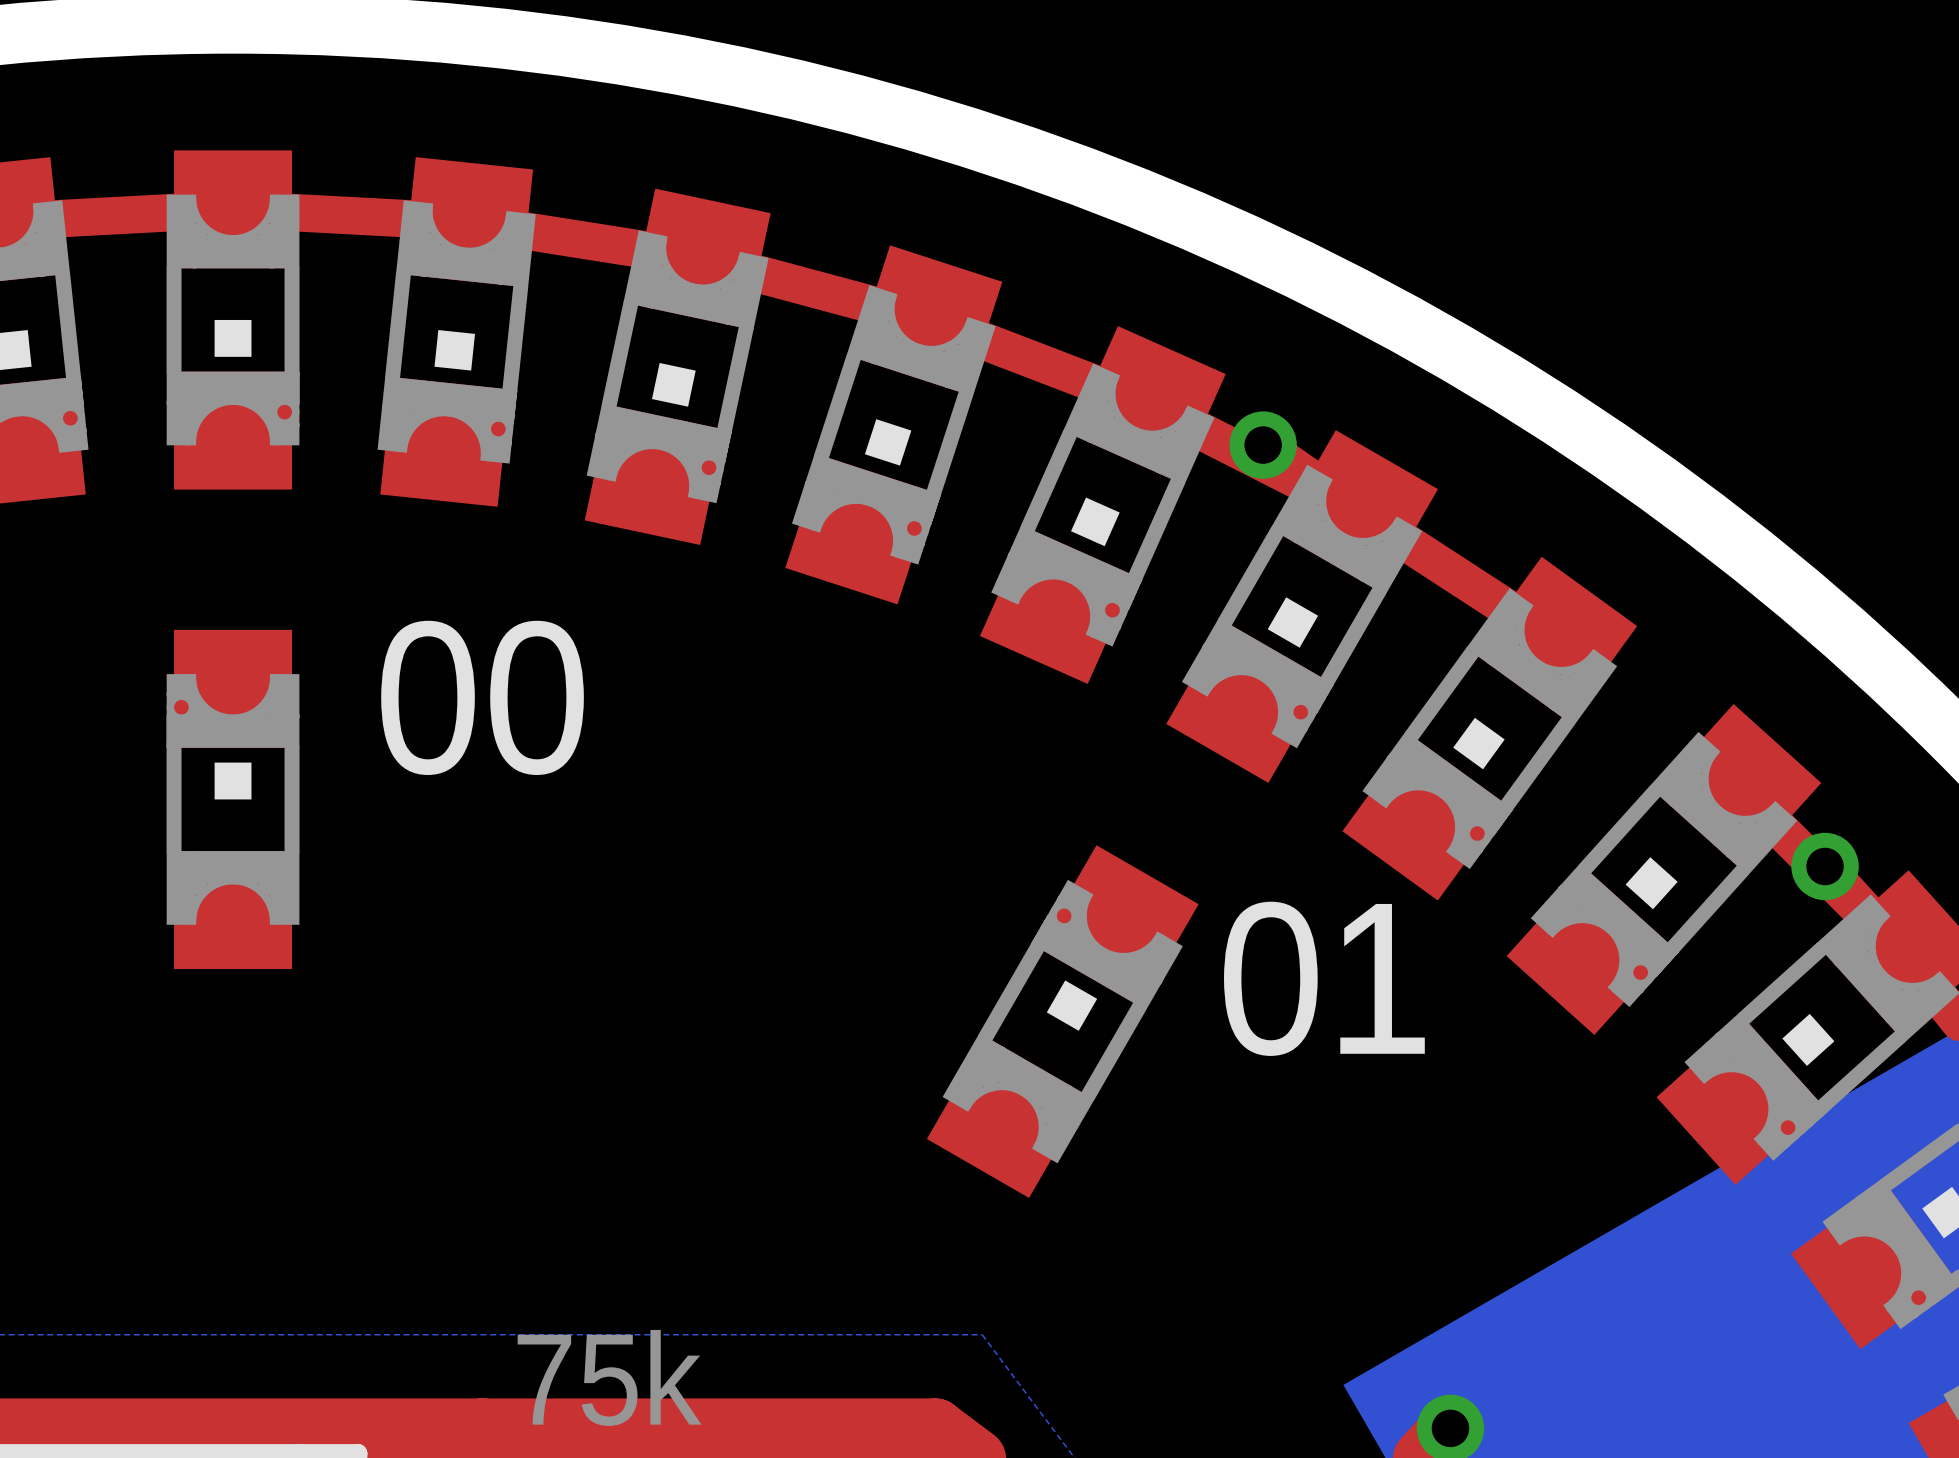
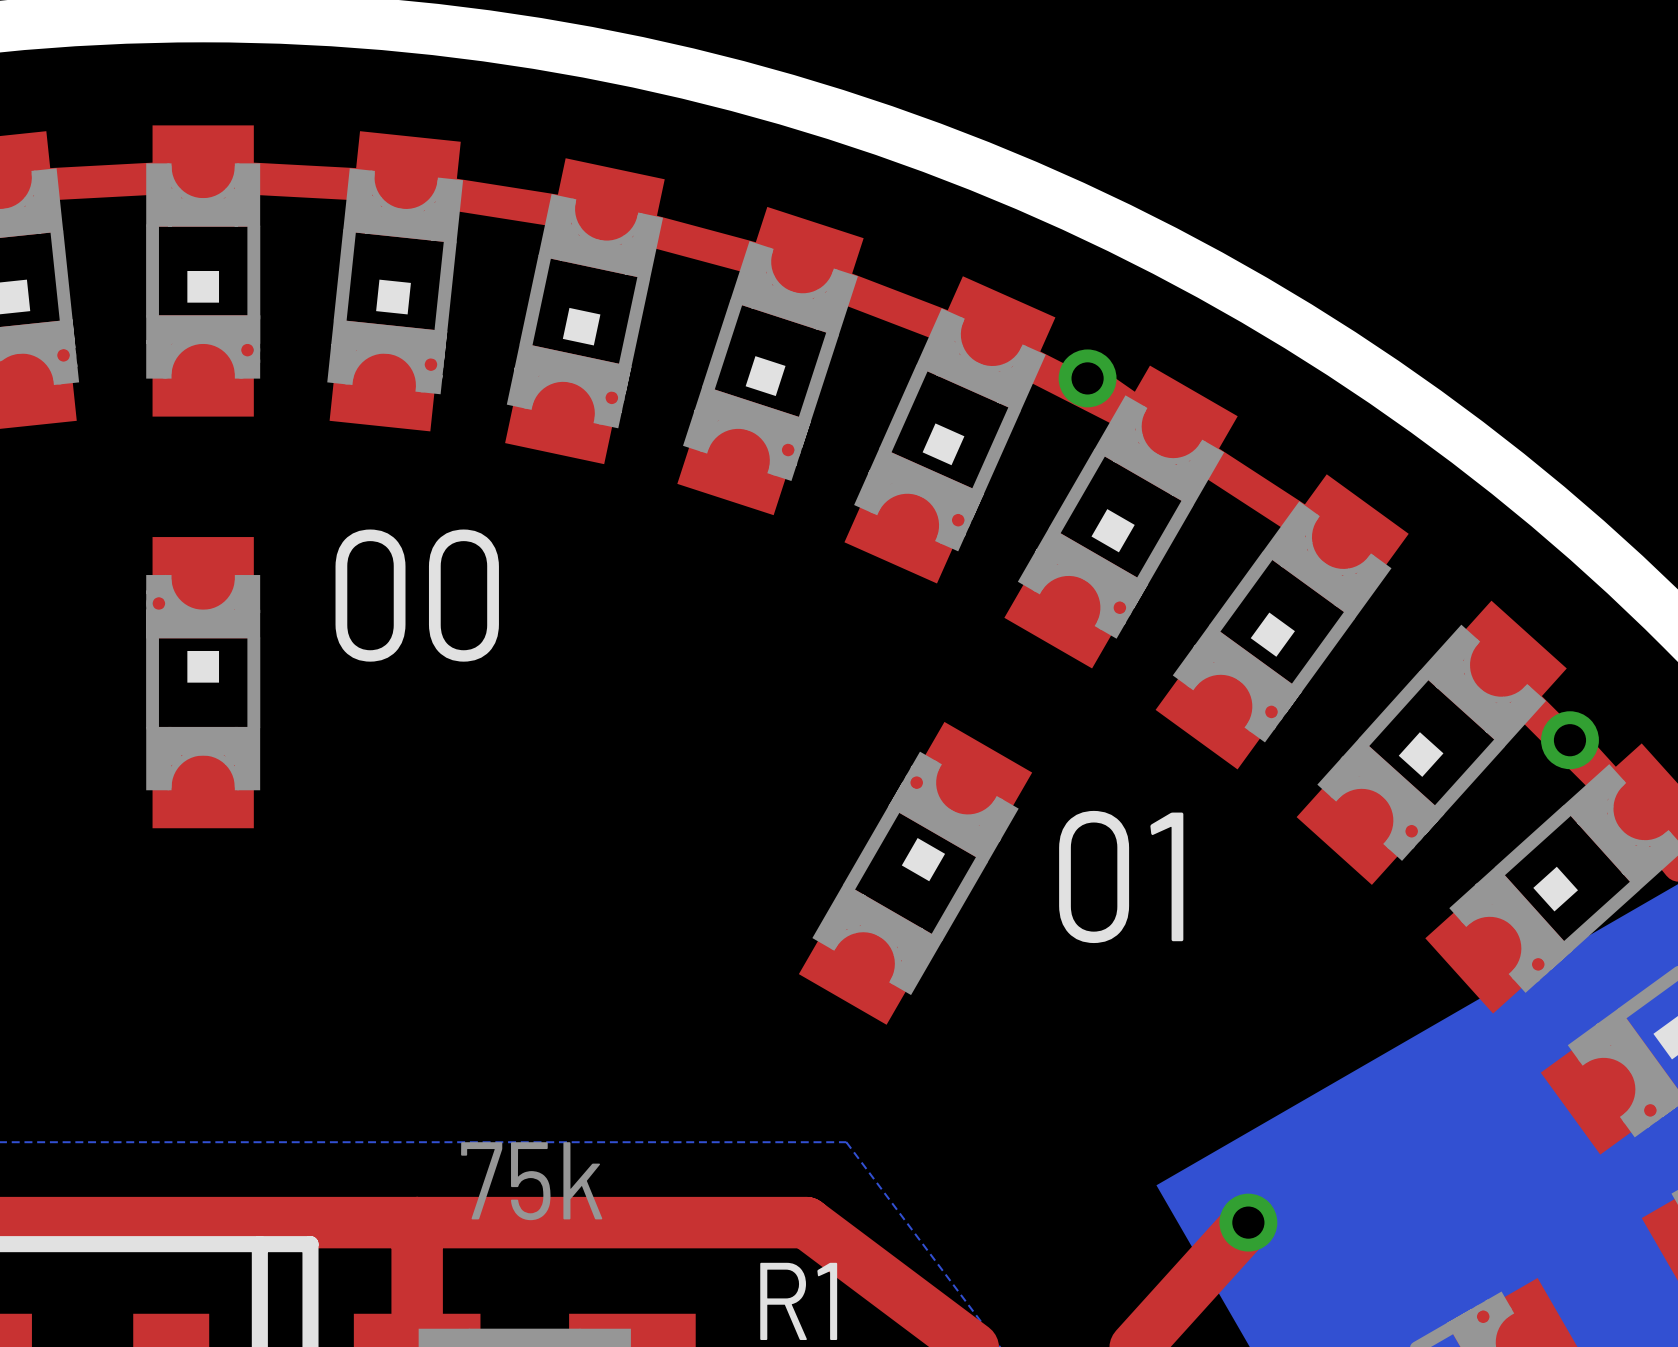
text position: 01 (1324, 978) -> 01 (1121, 876)

